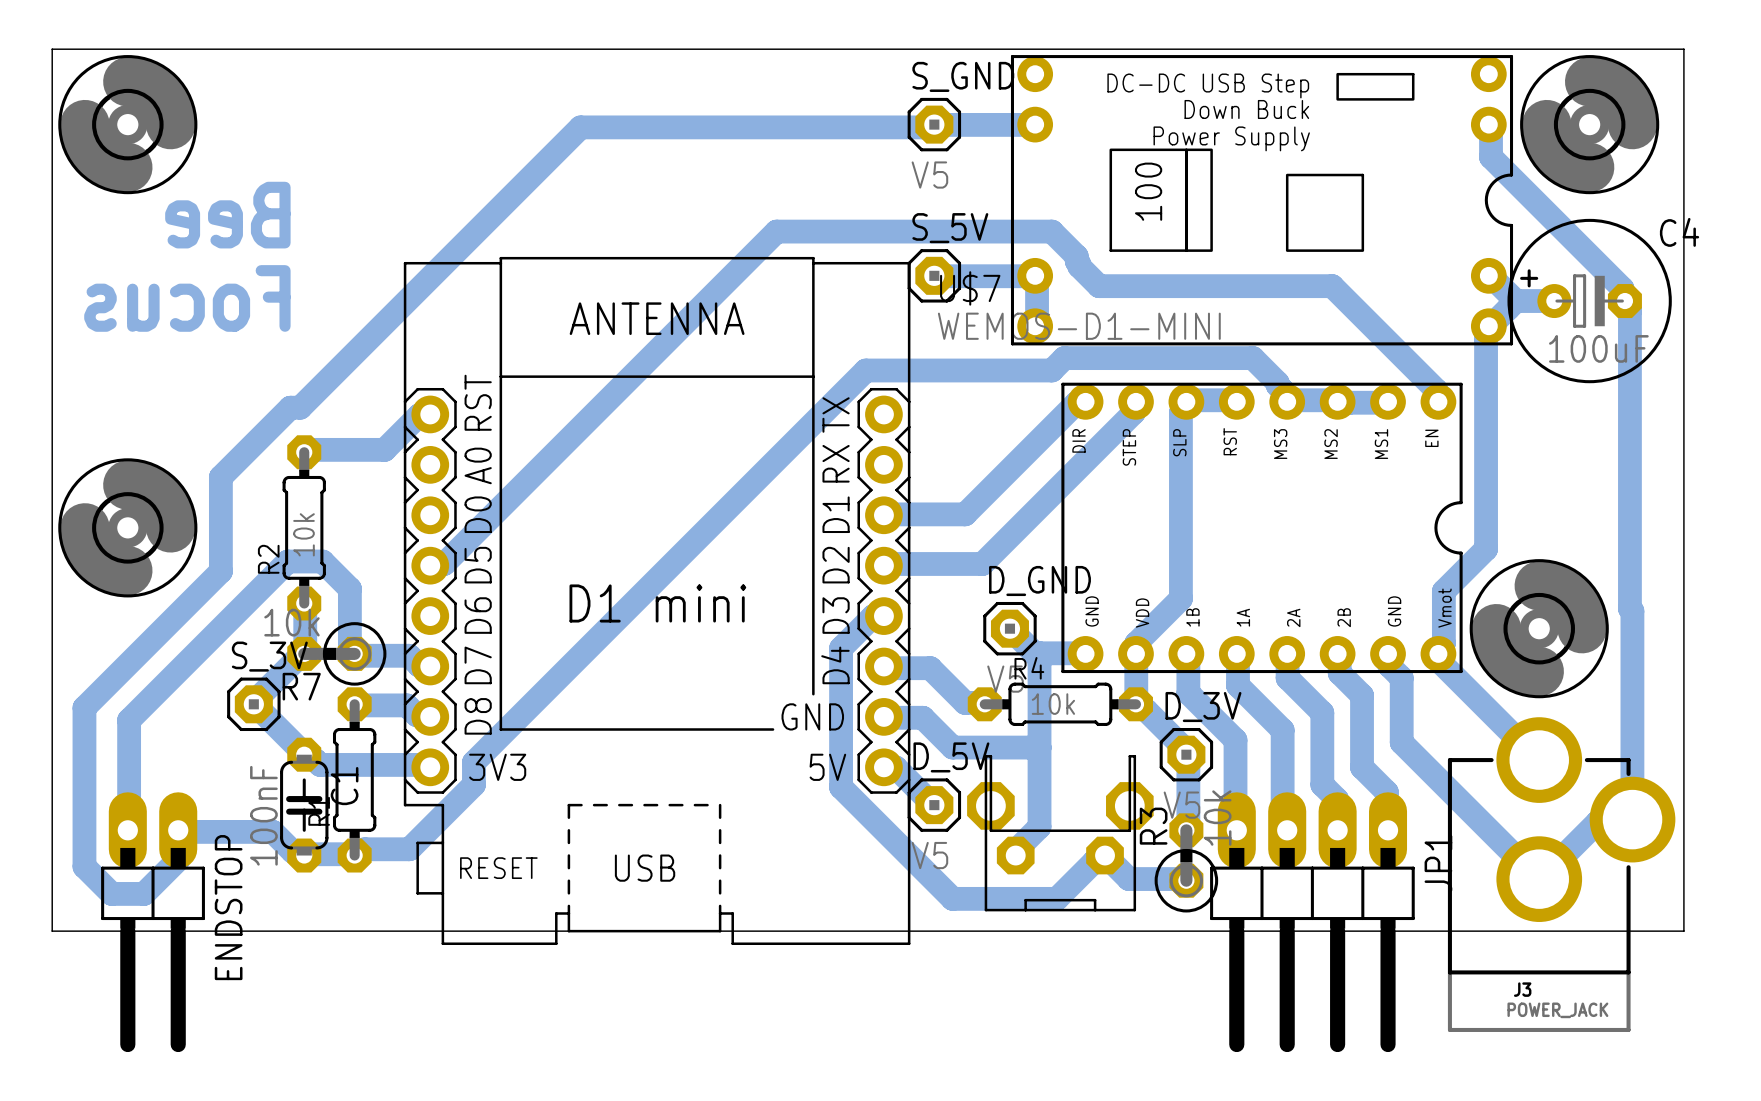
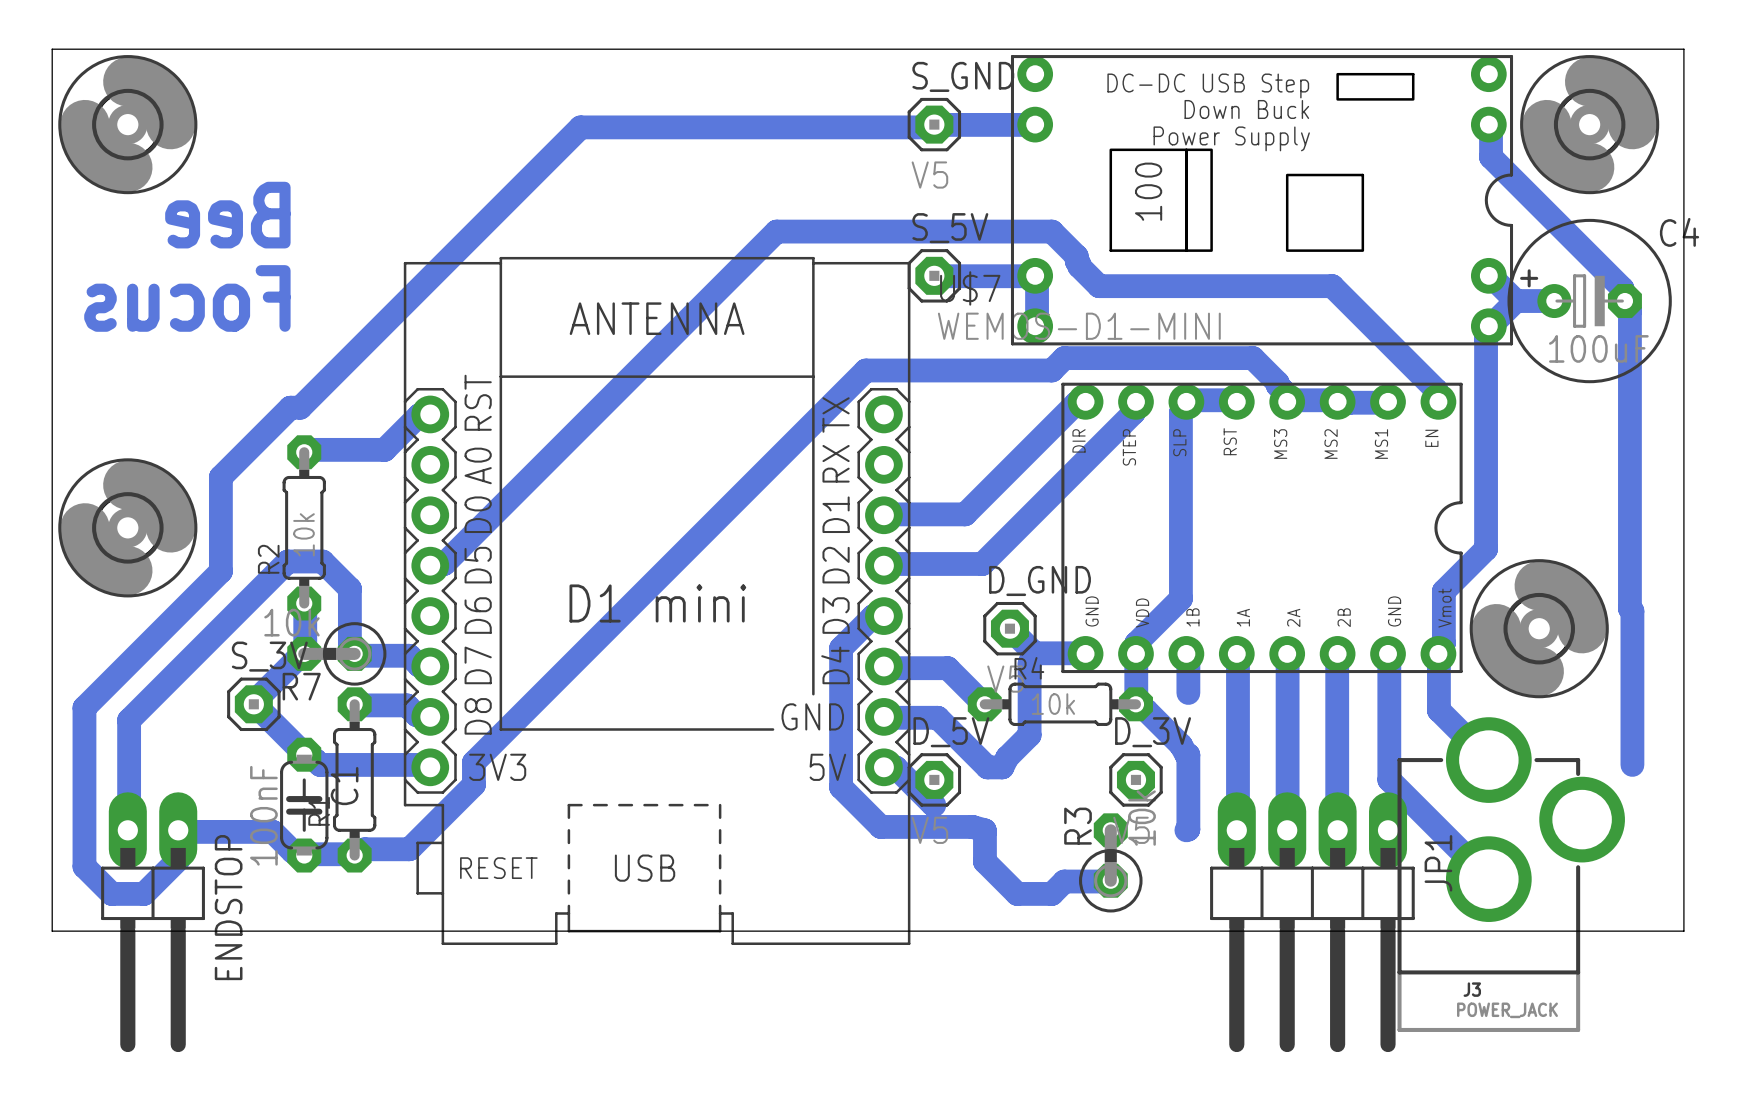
bottom track: (1039, 653) (1039, 826) (1017, 849) (1015, 855) -> none
bottom track: (1337, 653) (1339, 655) (1339, 673) (1362, 695) (1362, 767) (1386, 792) (1388, 830) -> none
bottom track: (1438, 660) (1539, 760) -> (1438, 660) (1438, 710) (1488, 759)
bottom track: (1389, 665) (1401, 678) (1401, 742) (1538, 879) (1597, 821) (1632, 821) (1632, 764) -> (1389, 665) (1389, 779) (1488, 879)
bottom track: (930, 668) (965, 702) (982, 702) -> (930, 668) (947, 668) (982, 702)
bottom track: (1287, 678) (1322, 712) (1322, 784) (1337, 799) -> (1337, 653) (1337, 799)
bottom track: (1237, 685) (1282, 730) (1282, 826) (1287, 830) -> (1287, 678) (1287, 830)
bottom track: (1188, 692) (1235, 740) (1236, 830) -> (1237, 685) (1236, 830)
bottom track: (922, 717) (952, 747) (1039, 747) -> (922, 717) (937, 717) (987, 767) (1002, 767) (1007, 757) (1029, 735) (1029, 663) (1034, 653)
D_3V position: (1186, 754) -> (1135, 779)
D_5V position: (934, 805) -> (934, 779)
bottom track: (880, 826) (952, 898) (1056, 898) (1094, 861) (1105, 855) (1128, 879) (1185, 879) (1186, 880) -> (880, 826) (972, 826) (984, 830) (984, 861) (1017, 893) (1051, 893) (1064, 881) (1110, 880)
part: (1060, 833) -> none
R3 position: (1186, 862) -> (1110, 862)
J3 position: (1561, 874) -> (1511, 874)

